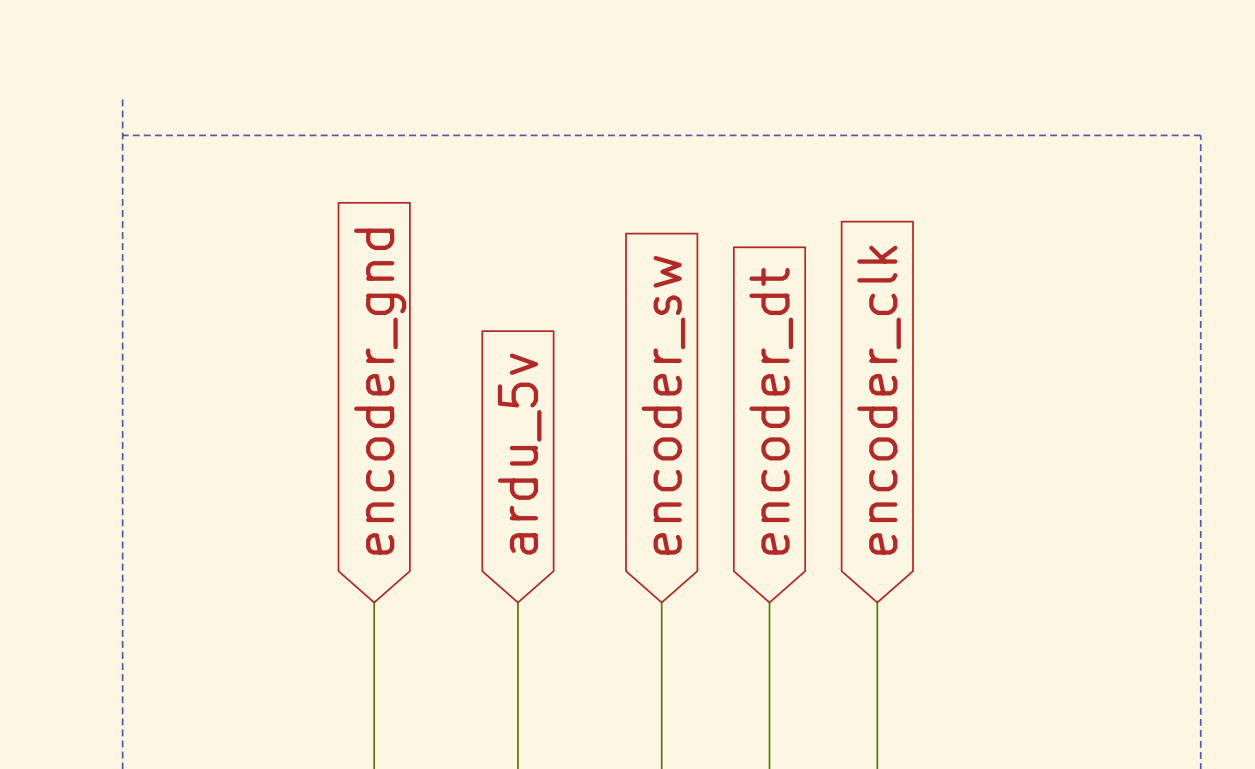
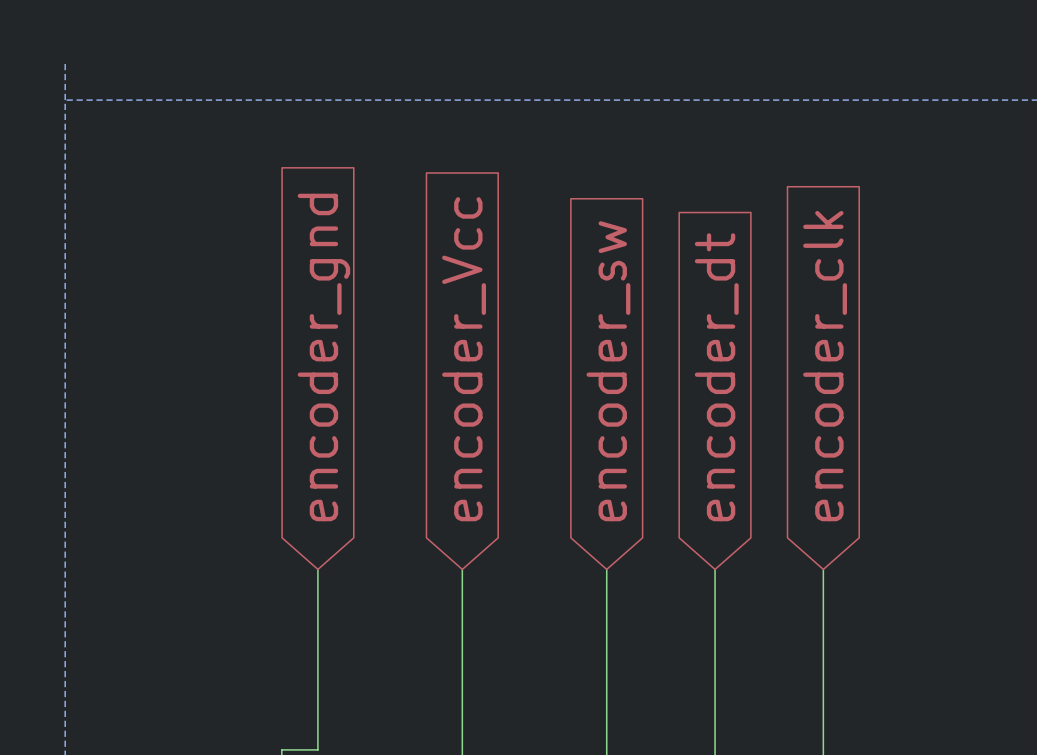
global label: ardu_5v (519, 454) -> encoder_Vcc (464, 359)

